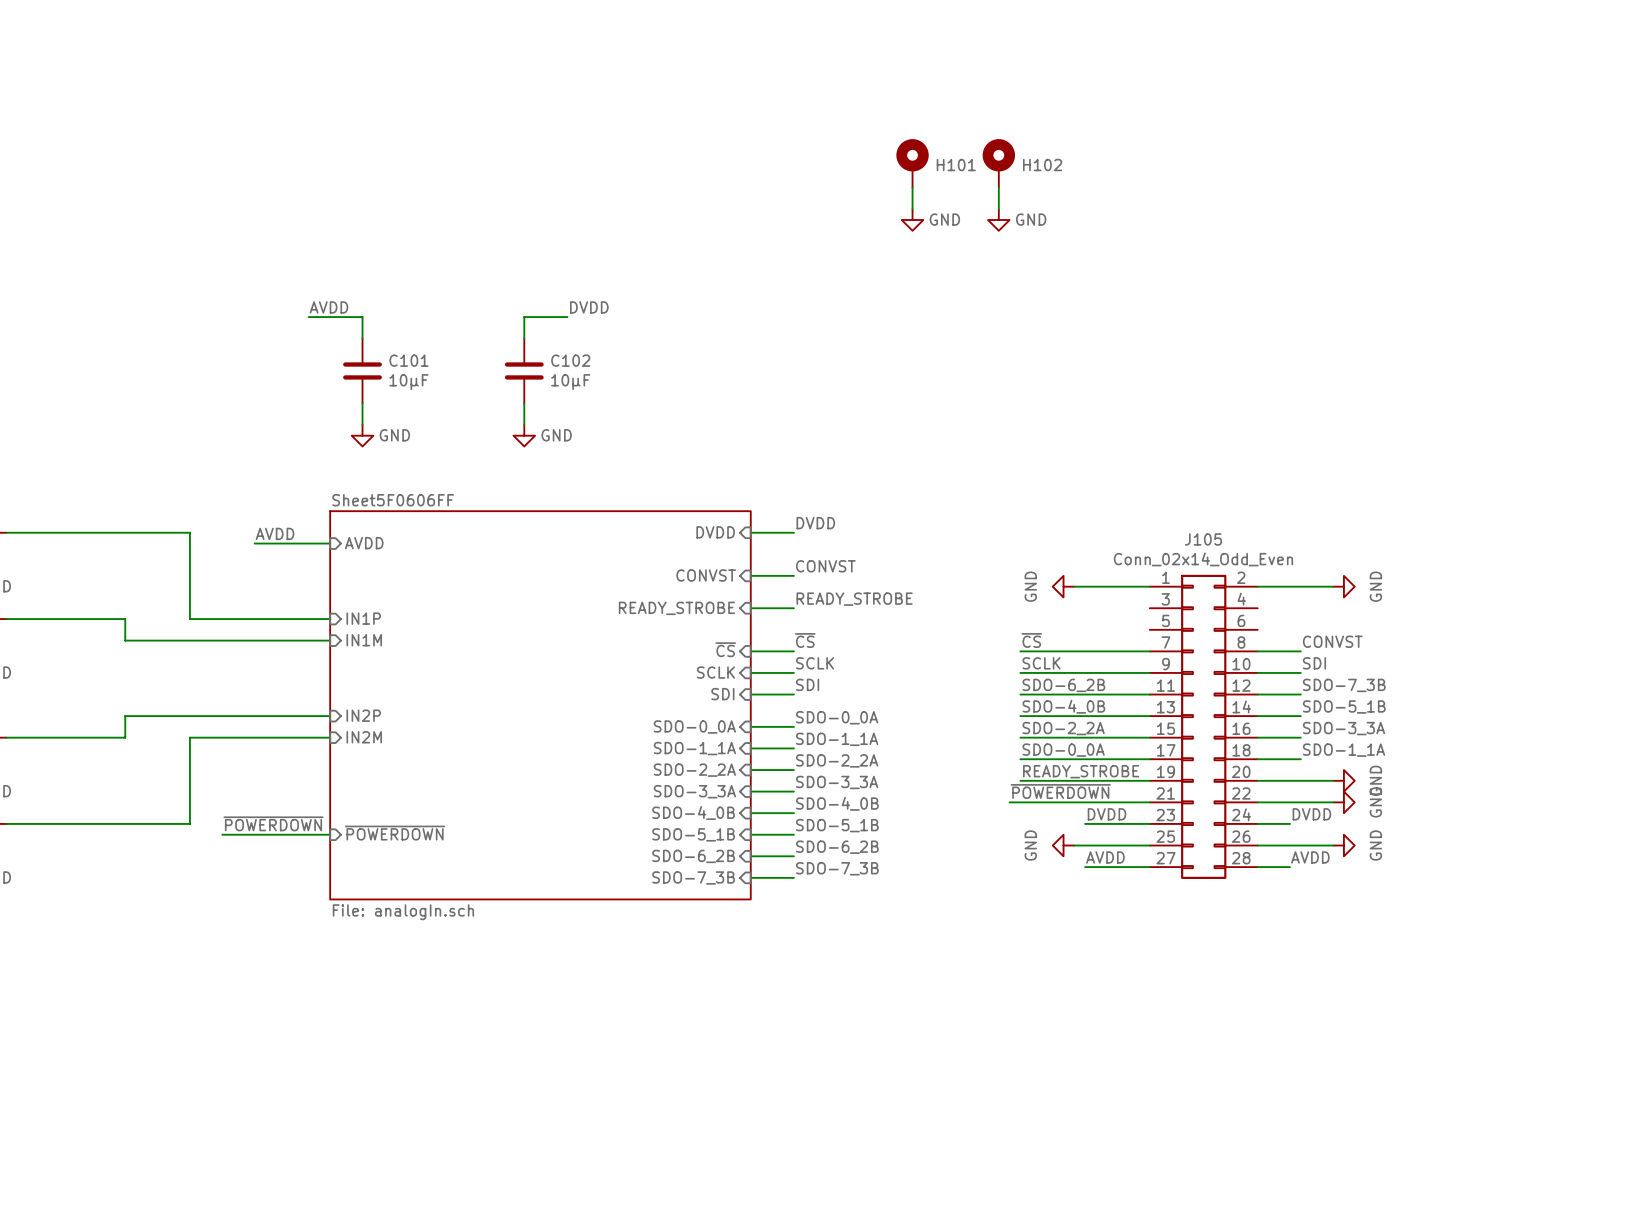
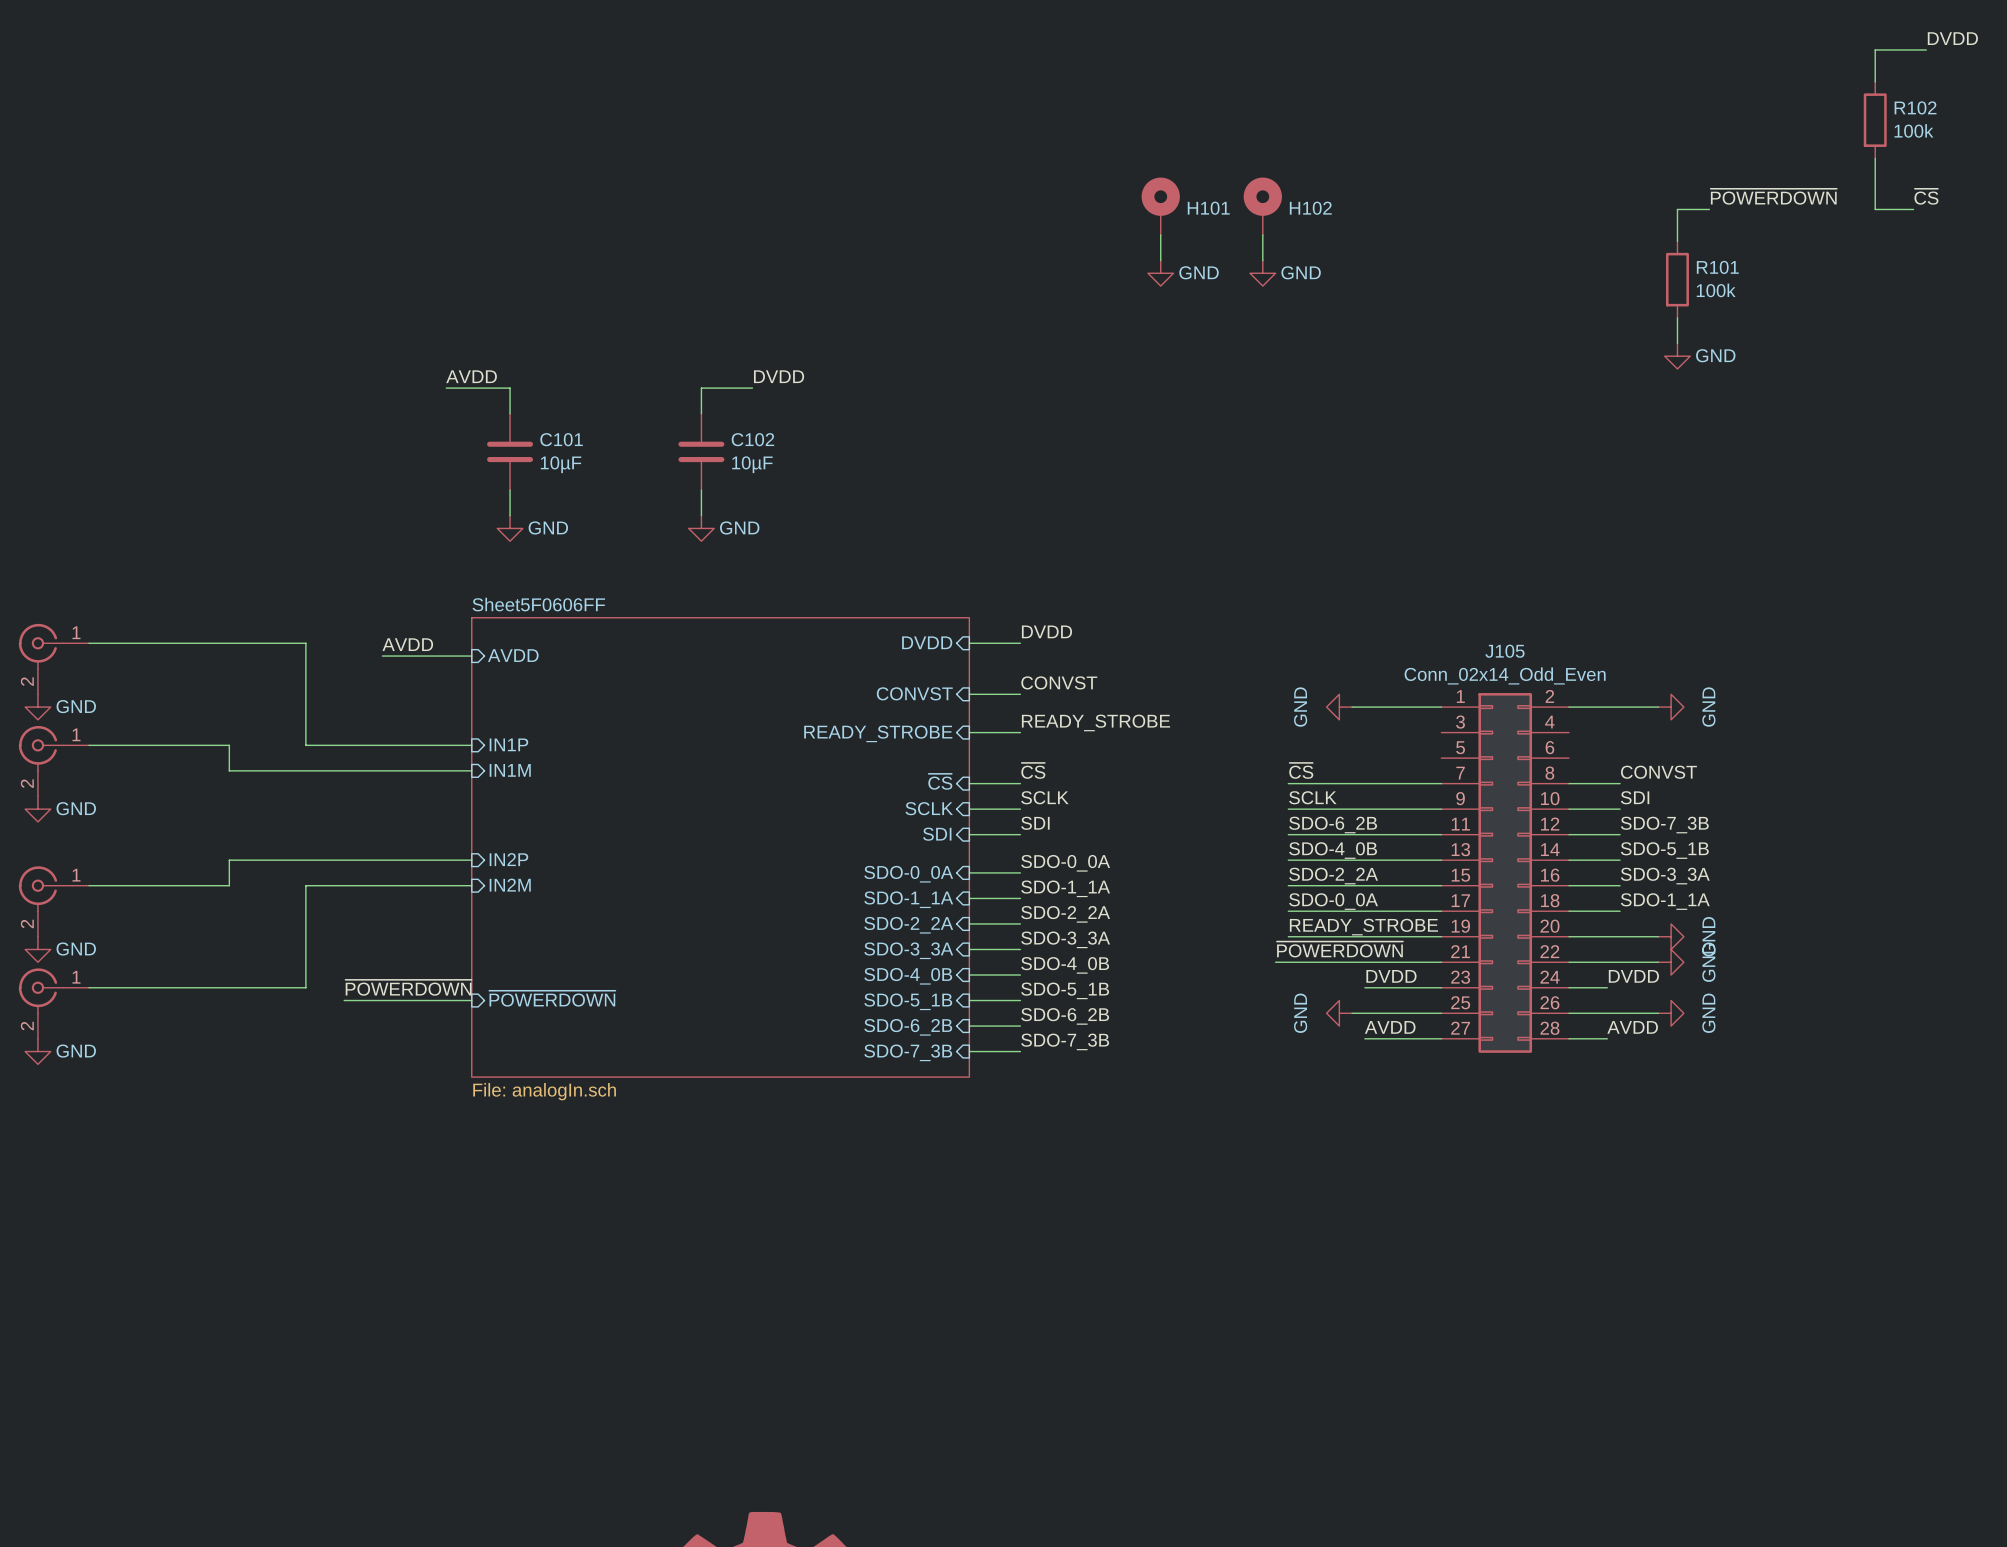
label: none -> DVDD (1952, 38)
wire: none -> (1926, 49) (1875, 49) (1875, 81)
R102: none -> 100k (1875, 120)
wire: none -> (1875, 158) (1875, 209) (1913, 209)
label: none -> ~{POWERDOWN} (1773, 196)
label: none -> ~{CS} (1926, 196)
wire: none -> (1709, 209) (1677, 209) (1677, 241)
R101: none -> 100k (1677, 279)
wire: none -> (1677, 317) (1677, 343)
power symbol: none -> GND (1677, 356)

